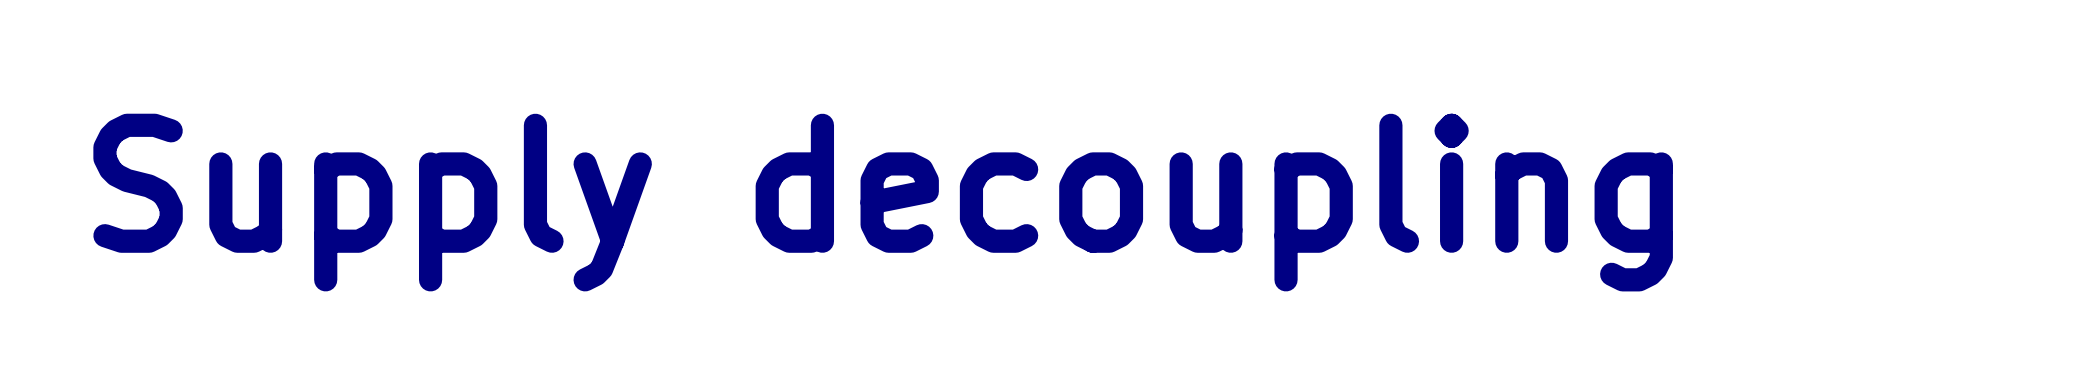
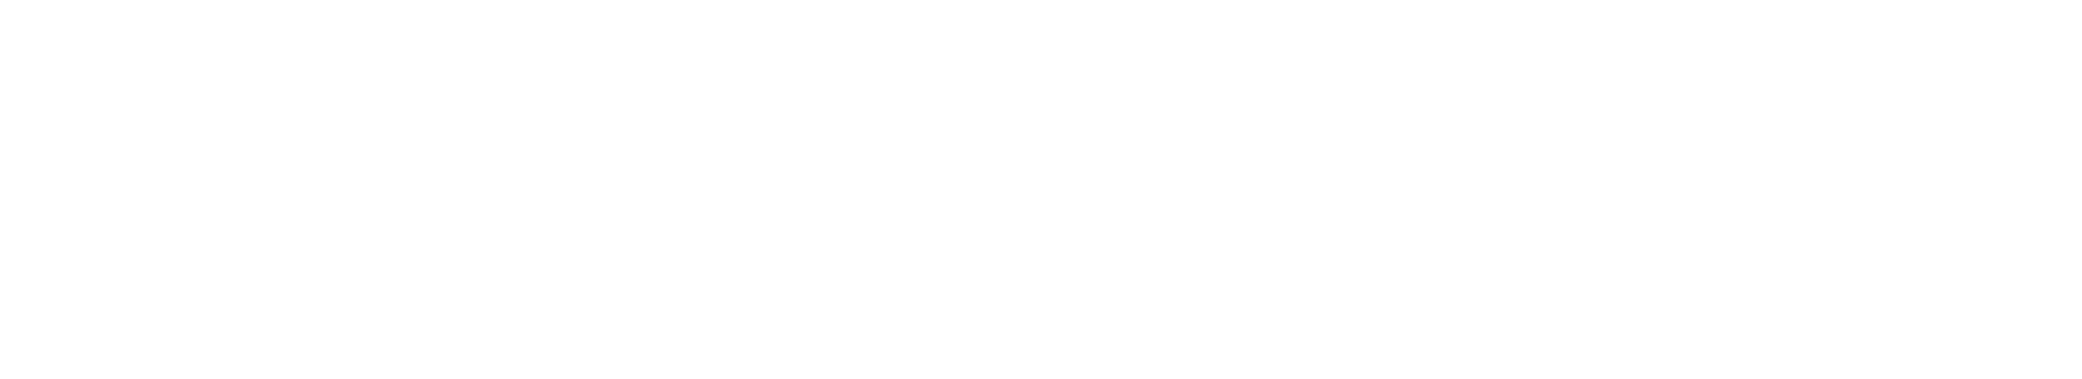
text: Supply decoupling (883, 202) -> none

